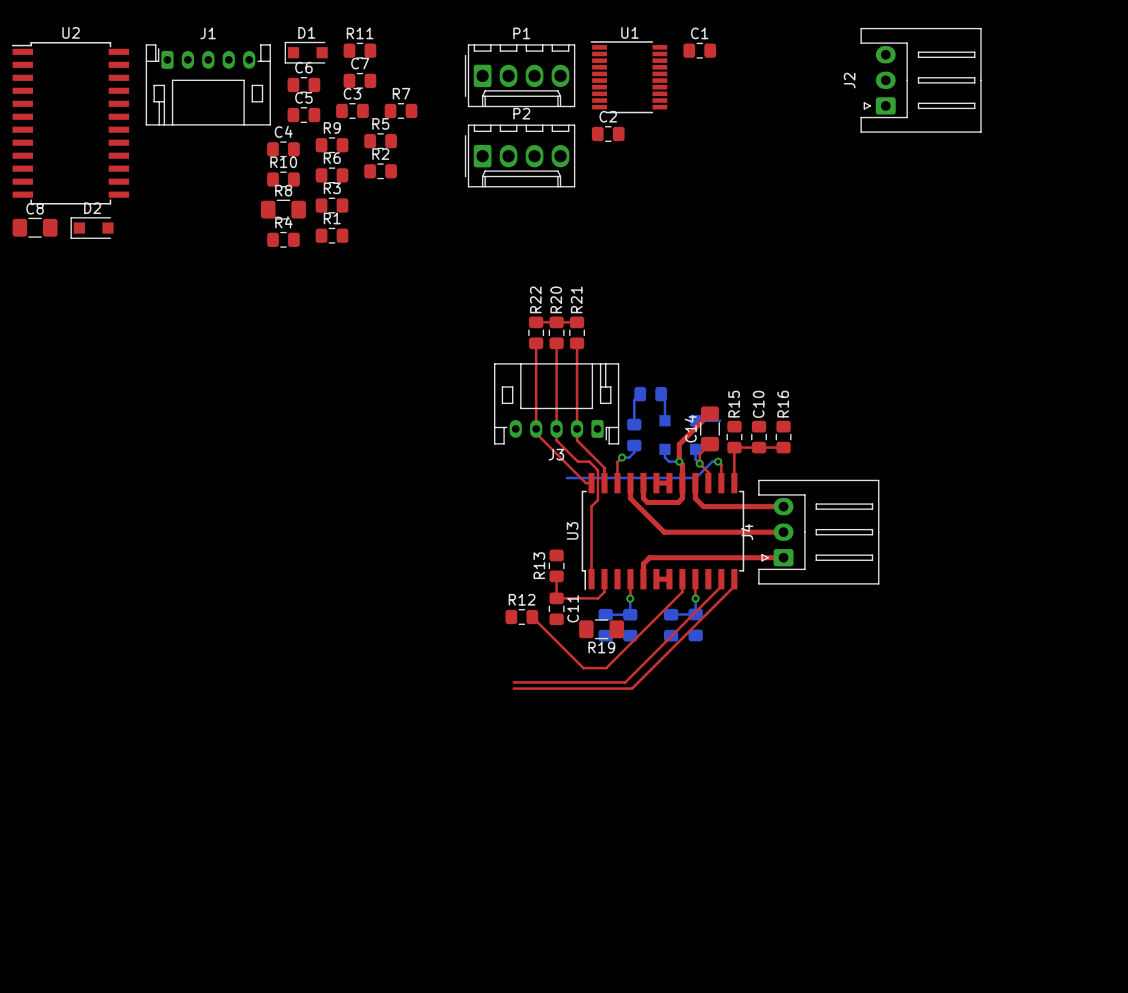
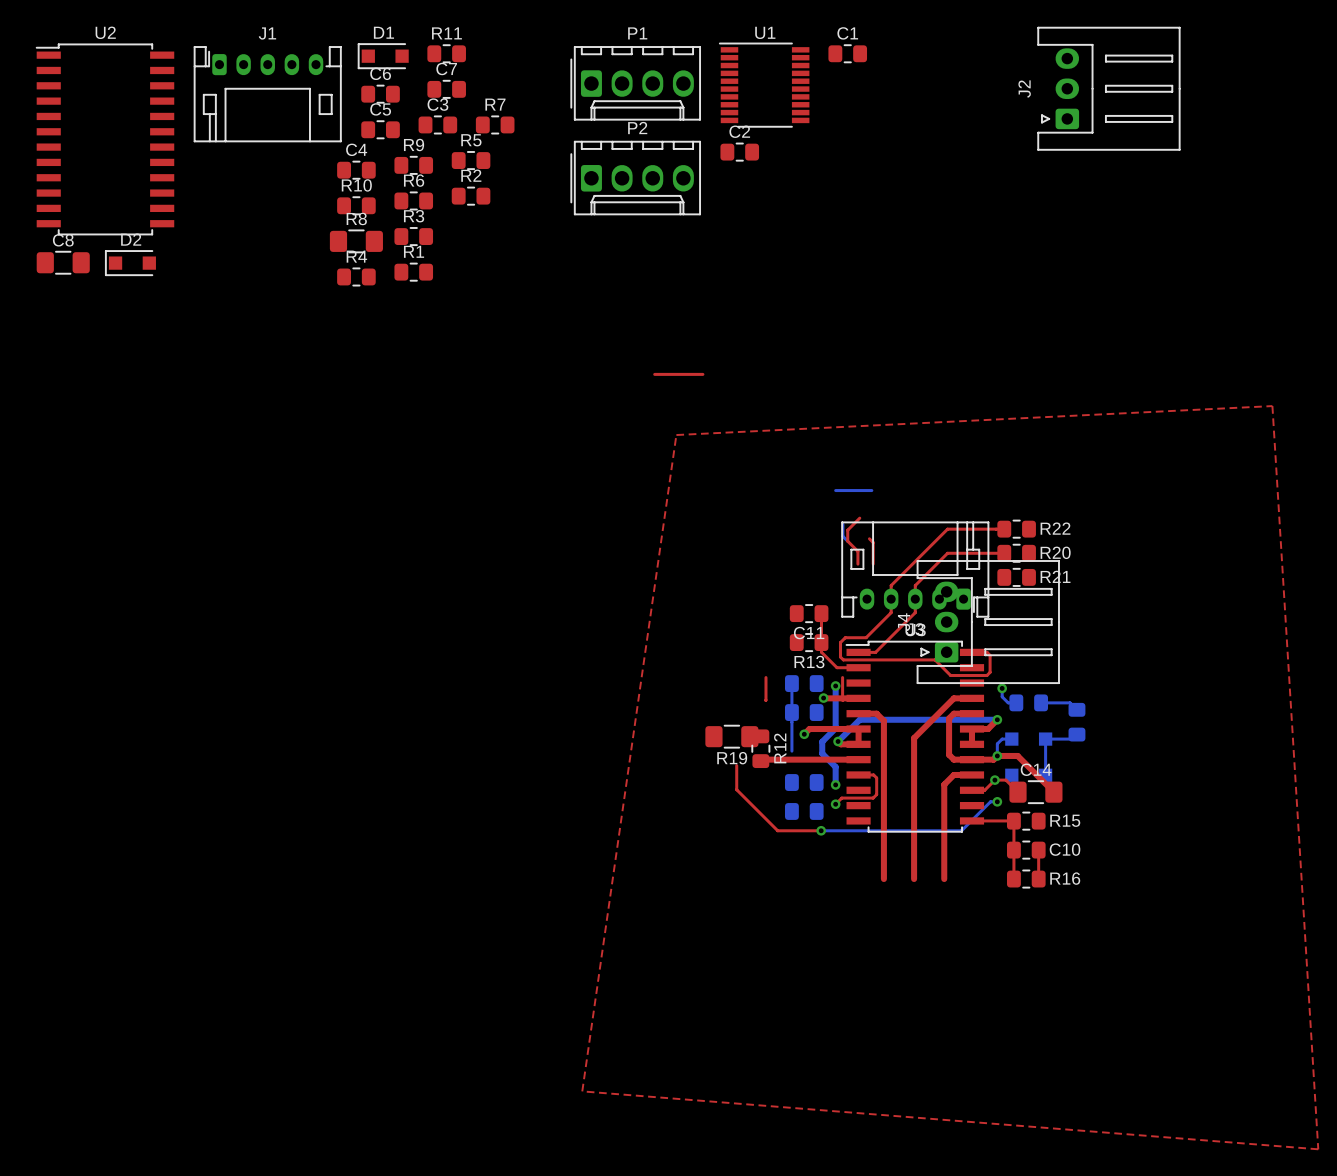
R22 rotation: 0° (536, 332) -> 90° clockwise (1016, 529)
R22 position: (536, 332) -> (1016, 529)
R20 rotation: 0° (556, 332) -> 90° clockwise (1016, 553)
R20 position: (556, 332) -> (1016, 553)
R21 rotation: 0° (577, 332) -> 90° clockwise (1016, 577)
R21 position: (577, 332) -> (1016, 577)
top track: (536, 343) (536, 433) (585, 483) (591, 483) -> none
top track: (556, 343) (556, 440) (577, 461) (589, 461) (597, 470) (597, 500) (591, 506) (591, 579) -> none
top track: (577, 343) (577, 440) (604, 467) (604, 483) -> none
top zone outline: none -> (1272, 406) (676, 435) (582, 1091) (1318, 1149) (1272, 406)
bottom track: (640, 394) (634, 400) (634, 424) -> none
part: (650, 394) -> none
bottom track: (661, 394) (664, 397) (664, 420) -> none
J3 position: (556, 403) -> (915, 569)
top track: (709, 413) (679, 444) (679, 461) (682, 464) (682, 498) (678, 502) (647, 502) (643, 498) (643, 483) -> none
C14 rotation: 0° (709, 428) -> 90° clockwise (1035, 792)
C14 position: (709, 428) -> (1035, 792)
part: (634, 435) -> none
part: (664, 435) -> none
part: (695, 435) -> none
R15 rotation: 0° (734, 437) -> 90° clockwise (1026, 821)
R15 position: (734, 437) -> (1026, 821)
C10 rotation: 0° (759, 437) -> 90° clockwise (1026, 850)
C10 position: (759, 437) -> (1026, 850)
R16 rotation: 0° (783, 437) -> 90° clockwise (1026, 879)
R16 position: (783, 437) -> (1026, 879)
bottom track: (634, 445) (634, 452) (629, 457) (622, 457) -> none
top track: (783, 447) (734, 447) (734, 483) -> none
bottom track: (664, 449) (664, 457) (669, 461) (679, 461) -> none
top track: none -> (1004, 529) (947, 529) (891, 585) (891, 612) (866, 637) (845, 637) (840, 642) (840, 657) (843, 659) (935, 659) (950, 675) (986, 675) (990, 672) (990, 655) (987, 652) (972, 652)
top track: (622, 457) (617, 462) (617, 483) -> none
via: (622, 457) -> none
via: (679, 461) -> none
bottom track: (718, 461) (712, 461) (695, 477) (566, 477) -> none
via: (718, 461) -> none
via: (699, 463) -> none
top track: none -> (1004, 553) (947, 553) (915, 585) (915, 612) (875, 652) (858, 652)
top track: (630, 483) (630, 498) (664, 532) (783, 532) -> none
top track: (656, 483) (669, 483) -> none
top track: (695, 483) (695, 498) (703, 506) (783, 506) -> none
top track: none -> (821, 613) (821, 652) (836, 667) (858, 667)
U3 rotation: 0° (662, 531) -> 90° clockwise (914, 736)
U3 position: (662, 531) -> (914, 736)
top track: (783, 557) (649, 557) (643, 563) (643, 579) -> none
R13 name position: R13 (539, 565) -> R13 (809, 662)
R13 rotation: 0° (556, 565) -> 90° clockwise (809, 642)
R13 position: (556, 565) -> (809, 642)
top track: (556, 576) (556, 598) (598, 598) (604, 591) (604, 579) -> none
top track: (656, 579) (669, 579) -> none
top track: (682, 579) (682, 591) (606, 668) (583, 668) (532, 617) -> none
top track: (721, 579) (721, 586) (625, 682) (513, 682) -> none
top track: (734, 579) (734, 586) (632, 688) (513, 688) -> none
bottom track: none -> (791, 683) (791, 751)
part: none -> (804, 683)
bottom track: none -> (835, 685) (835, 728) (822, 741) (822, 753) (835, 766) (835, 784)
via: none -> (835, 685)
bottom track: none -> (1002, 688) (1002, 696) (1008, 702) (1016, 702)
via: none -> (1002, 688)
top track: none -> (823, 698) (858, 698)
via: none -> (823, 698)
top track: none -> (972, 698) (953, 698) (914, 738) (914, 879)
bottom track: (630, 598) (630, 614) (605, 614) -> none
via: (630, 598) -> none
bottom track: (695, 598) (695, 614) (671, 614) -> none
via: (695, 598) -> none
part: none -> (1028, 702)
bottom track: none -> (1041, 702) (1070, 702) (1076, 709)
C11 rotation: 0° (556, 608) -> 90° clockwise (809, 613)
C11 position: (556, 608) -> (809, 613)
part: none -> (804, 712)
top track: none -> (858, 713) (876, 713) (883, 720) (883, 879)
top track: none -> (972, 713) (953, 713) (949, 718) (949, 754) (953, 759) (993, 759) (997, 755) (1017, 755) (1053, 792)
top track: none -> (997, 719) (988, 729) (972, 729) (972, 744)
bottom track: none -> (997, 719) (859, 719) (838, 741)
via: none -> (997, 719)
R12 rotation: 0° (521, 617) -> 90° clockwise (760, 748)
R12 position: (521, 617) -> (760, 748)
part: none -> (1076, 722)
part: (695, 624) -> none
part: (605, 625) -> none
part: (630, 625) -> none
part: (671, 625) -> none
top track: none -> (804, 734) (809, 729) (858, 729) (858, 744) (840, 744) (838, 741)
via: none -> (804, 734)
bottom track: none -> (1076, 734) (1072, 739) (1045, 739) (1045, 775)
bottom track: none -> (1011, 739) (1002, 739) (997, 743) (997, 755)
part: none -> (1028, 739)
via: none -> (838, 741)
via: none -> (997, 755)
top track: none -> (858, 759) (760, 761)
top track: none -> (736, 765) (736, 789) (777, 830) (821, 830)
top track: none -> (858, 774) (873, 774) (876, 777) (876, 794) (873, 798) (841, 798) (835, 804)
top track: none -> (972, 774) (953, 774) (944, 784) (944, 879)
part: none -> (1028, 775)
via: none -> (994, 780)
part: none -> (804, 782)
via: none -> (835, 784)
top track: none -> (972, 790) (984, 790) (994, 780) (1005, 780) (1018, 792)
bottom track: none -> (997, 801) (990, 801) (961, 830) (821, 830)
via: none -> (997, 801)
via: none -> (835, 804)
part: none -> (804, 811)
top track: none -> (972, 820) (1013, 821) (1013, 879)
via: none -> (821, 830)
top track: none -> (1038, 850) (1038, 879)

